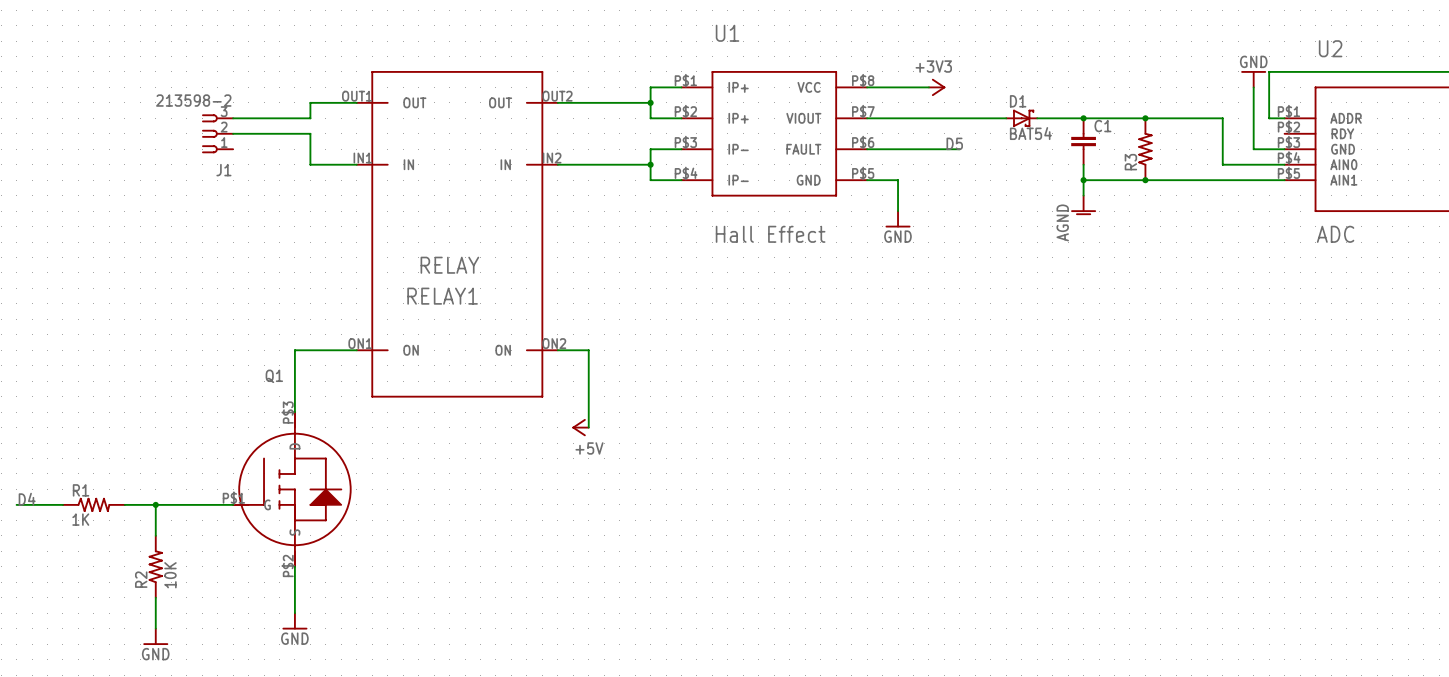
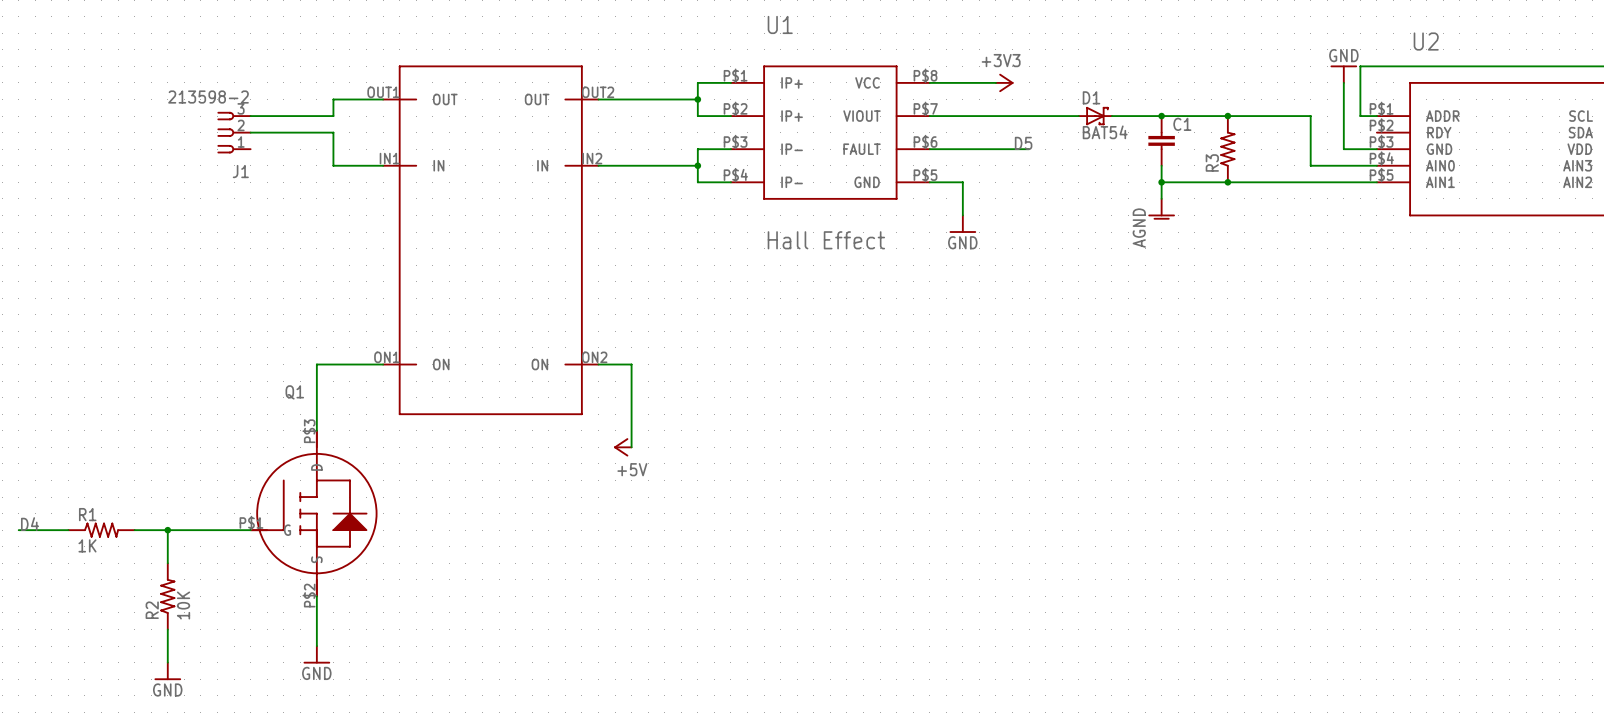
U2 value: ADC (1335, 234) -> none
RELAY1 value: RELAY (449, 265) -> none
RELAY1 name: RELAY1 (442, 296) -> none

